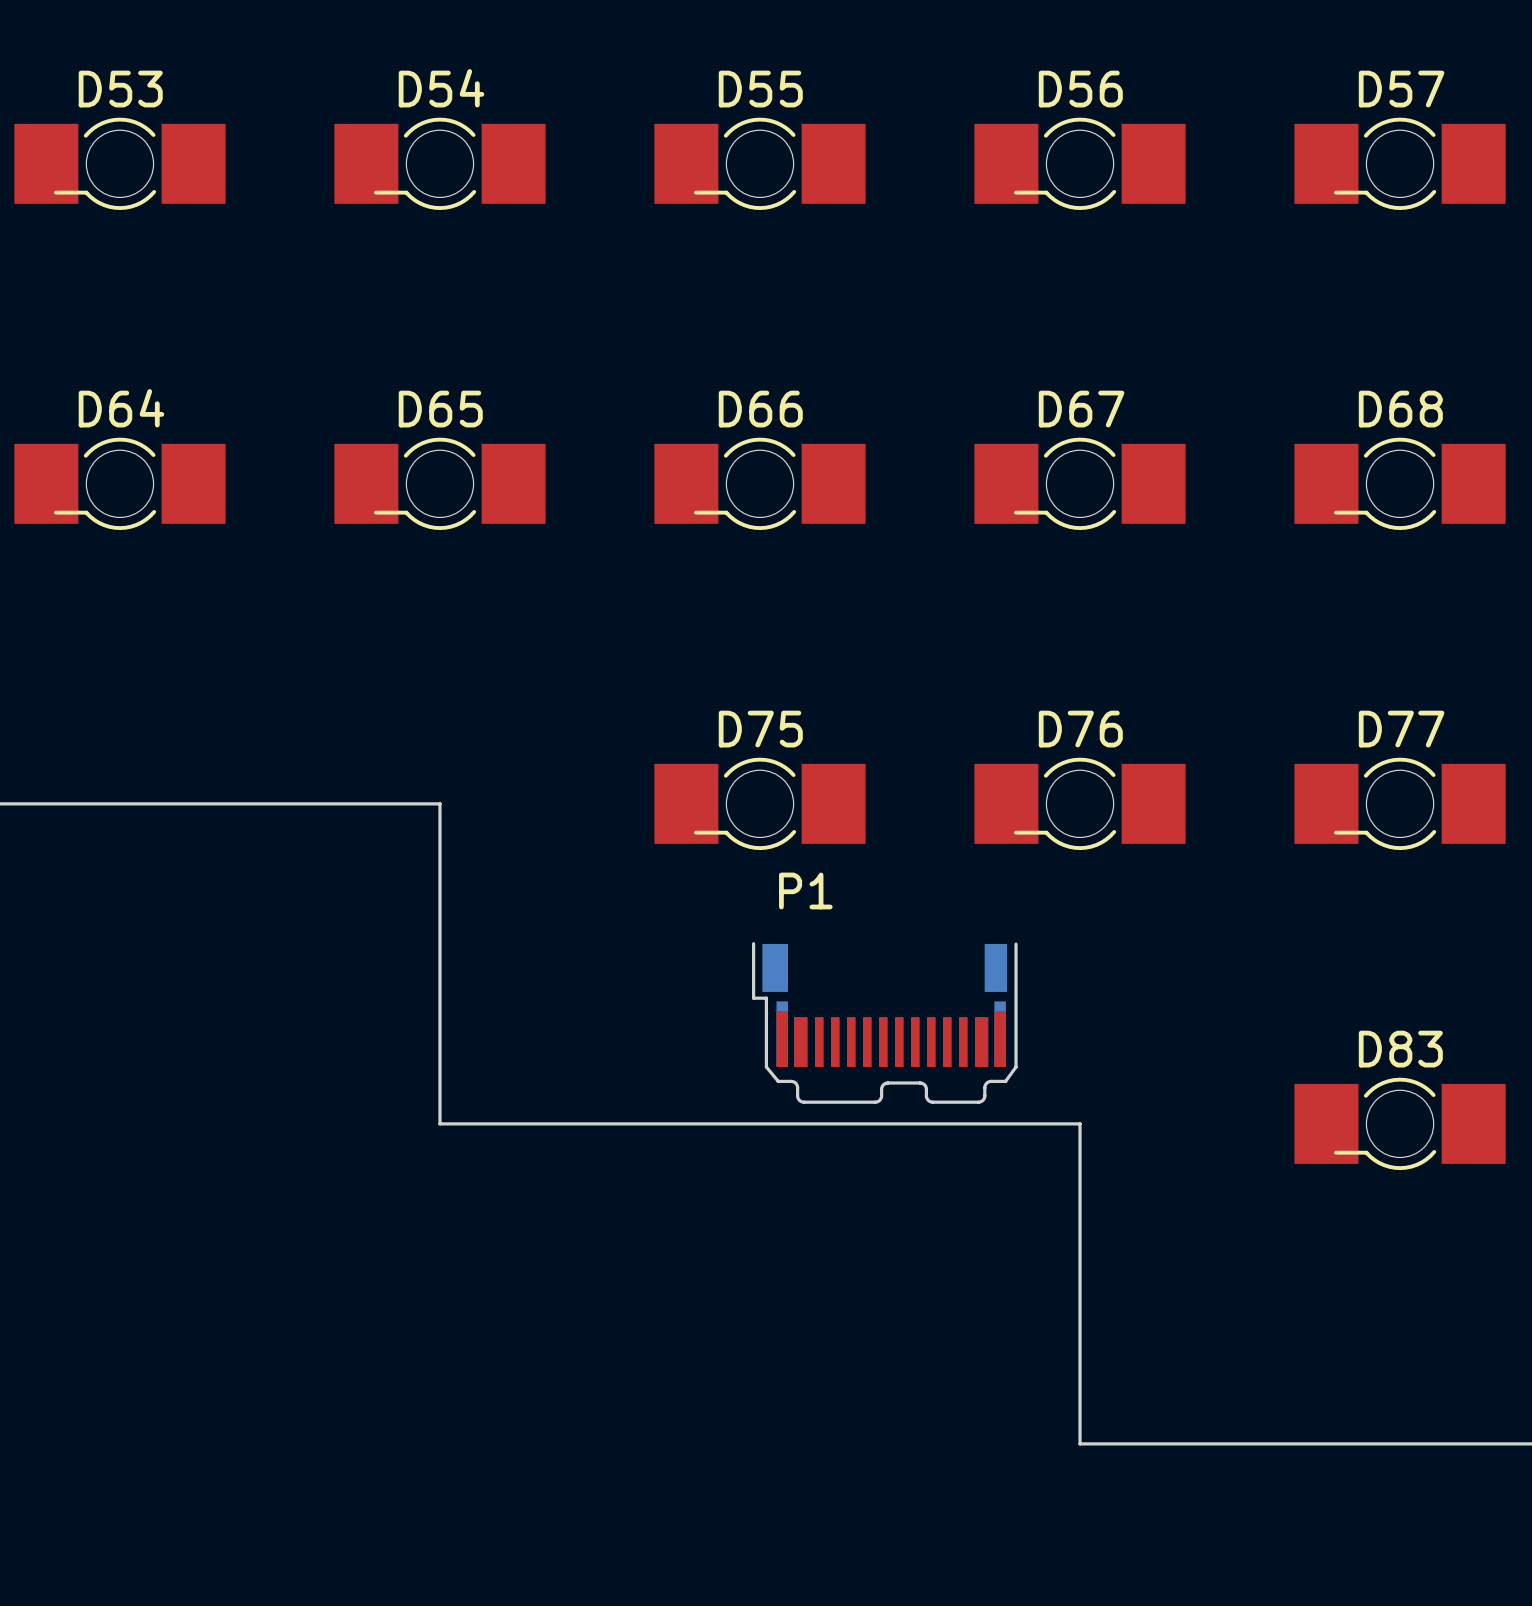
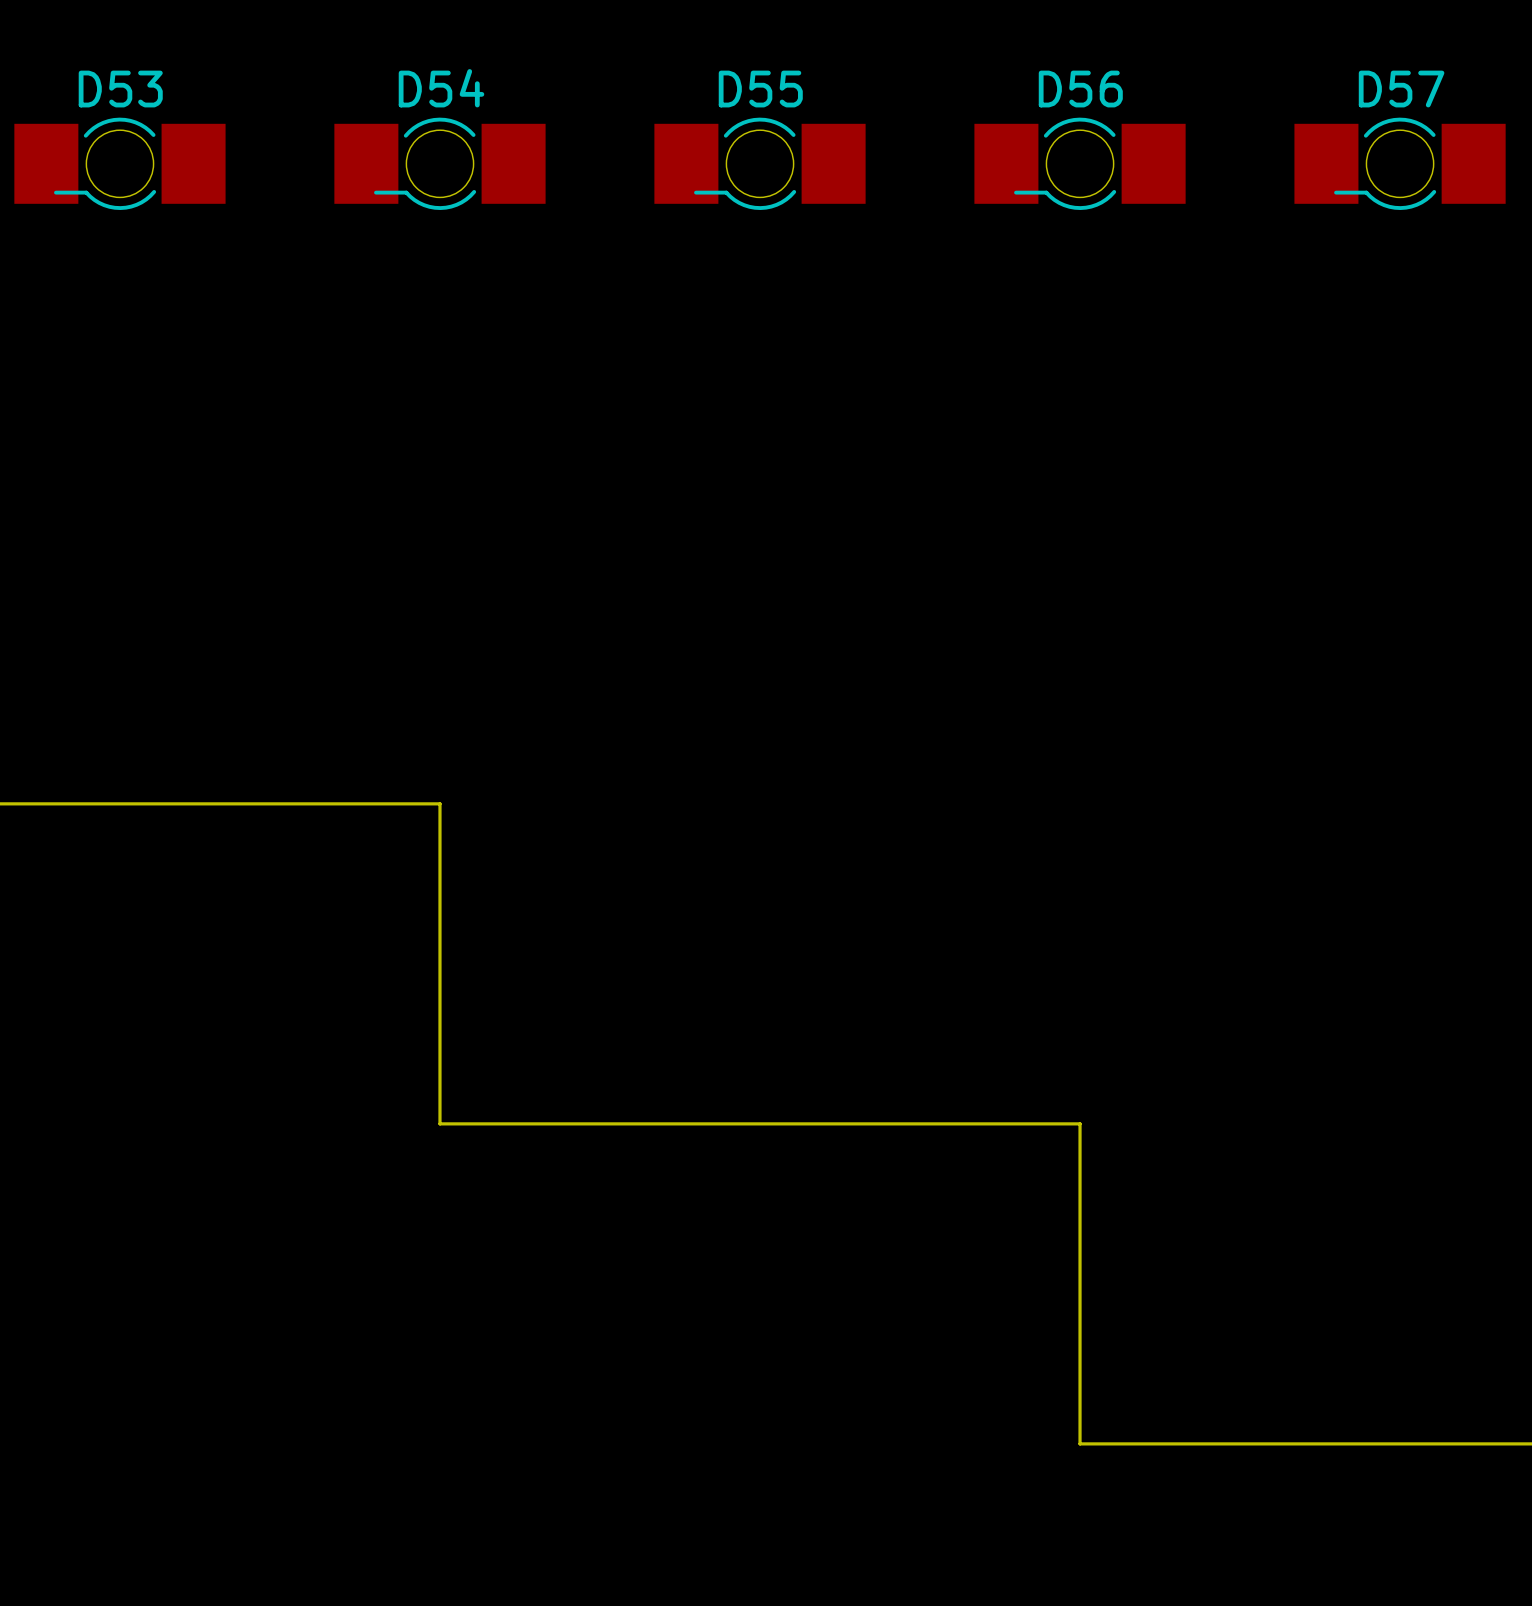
D64: (119, 483) -> none
D65: (439, 483) -> none
D66: (760, 483) -> none
D67: (1080, 483) -> none
D68: (1400, 483) -> none
D75: (760, 803) -> none
D76: (1080, 803) -> none
D77: (1400, 803) -> none
P1: (884, 1022) -> none
D83: (1400, 1123) -> none

